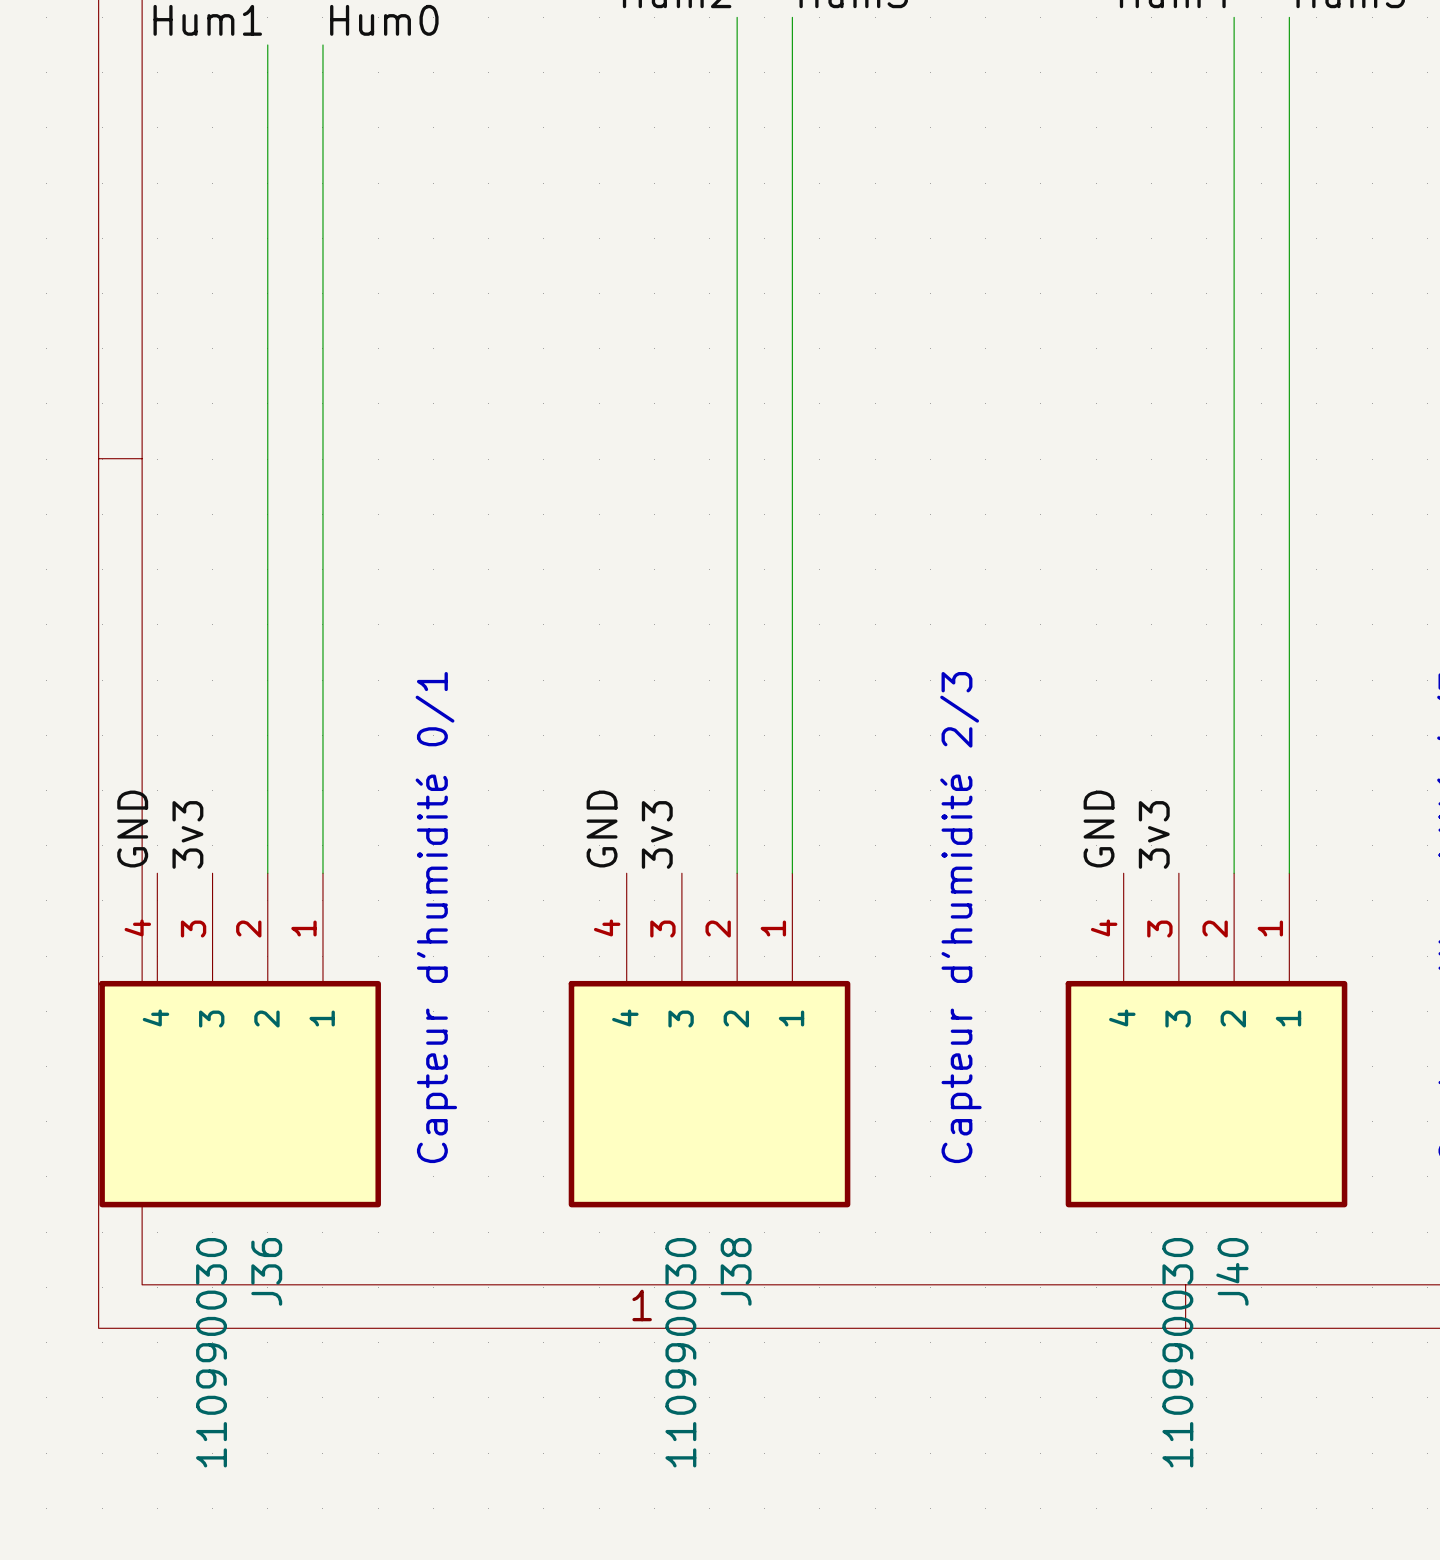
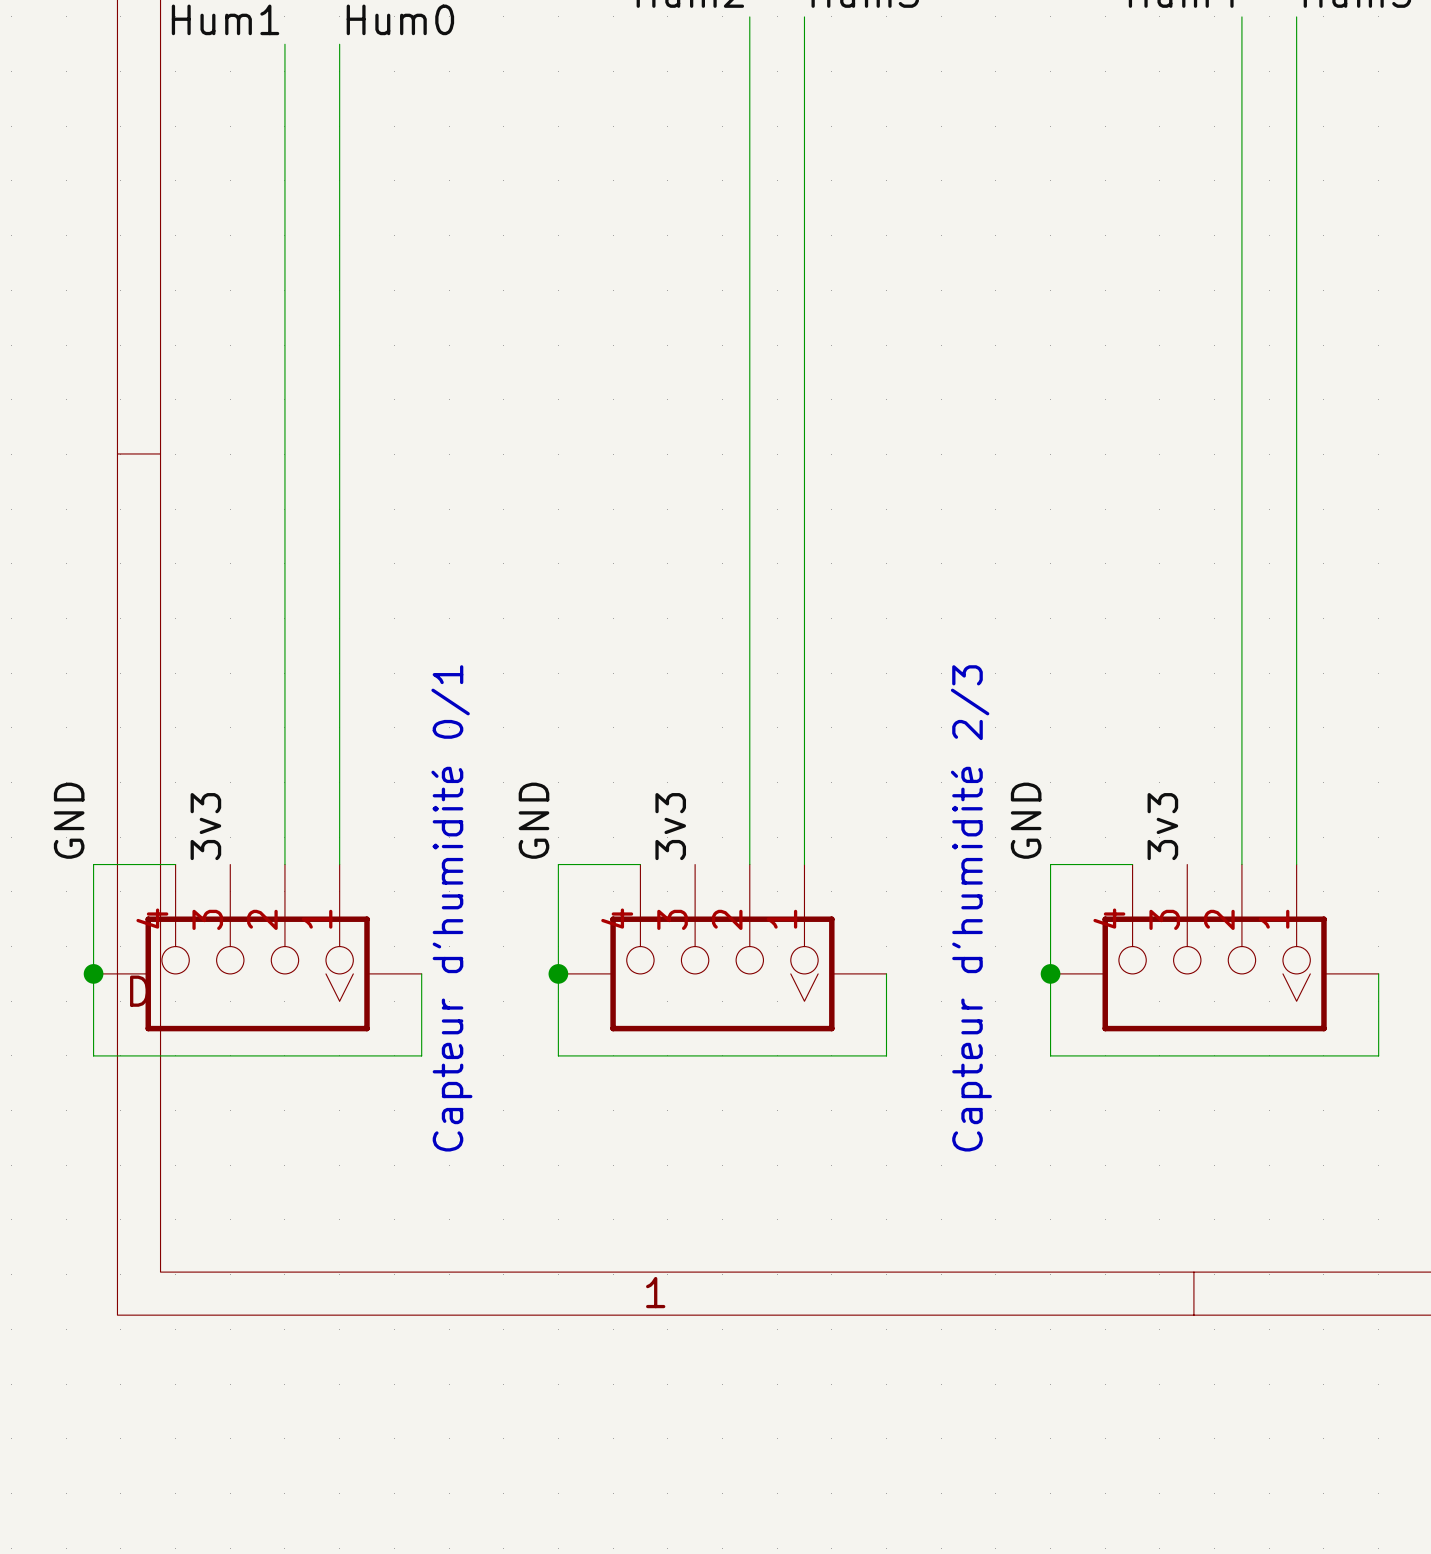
label position: GND (132, 829) -> GND (69, 820)
label position: GND (602, 829) -> GND (533, 820)
label position: GND (1099, 829) -> GND (1026, 820)
wire: none -> (175, 864) (93, 864) (93, 1055) (421, 1055) (421, 973)
wire: none -> (640, 864) (558, 864) (558, 1055) (886, 1055) (886, 973)
wire: none -> (1132, 864) (1050, 864) (1050, 1055) (1378, 1055) (1378, 973)
part: none -> (257, 947)
part: none -> (722, 947)
part: none -> (1214, 947)
junction: none -> (93, 973)
junction: none -> (558, 973)
junction: none -> (1050, 973)
J36: 110990030 (240, 1040) -> none
J38: 110990030 (709, 1040) -> none
J40: 110990030 (1206, 1040) -> none

